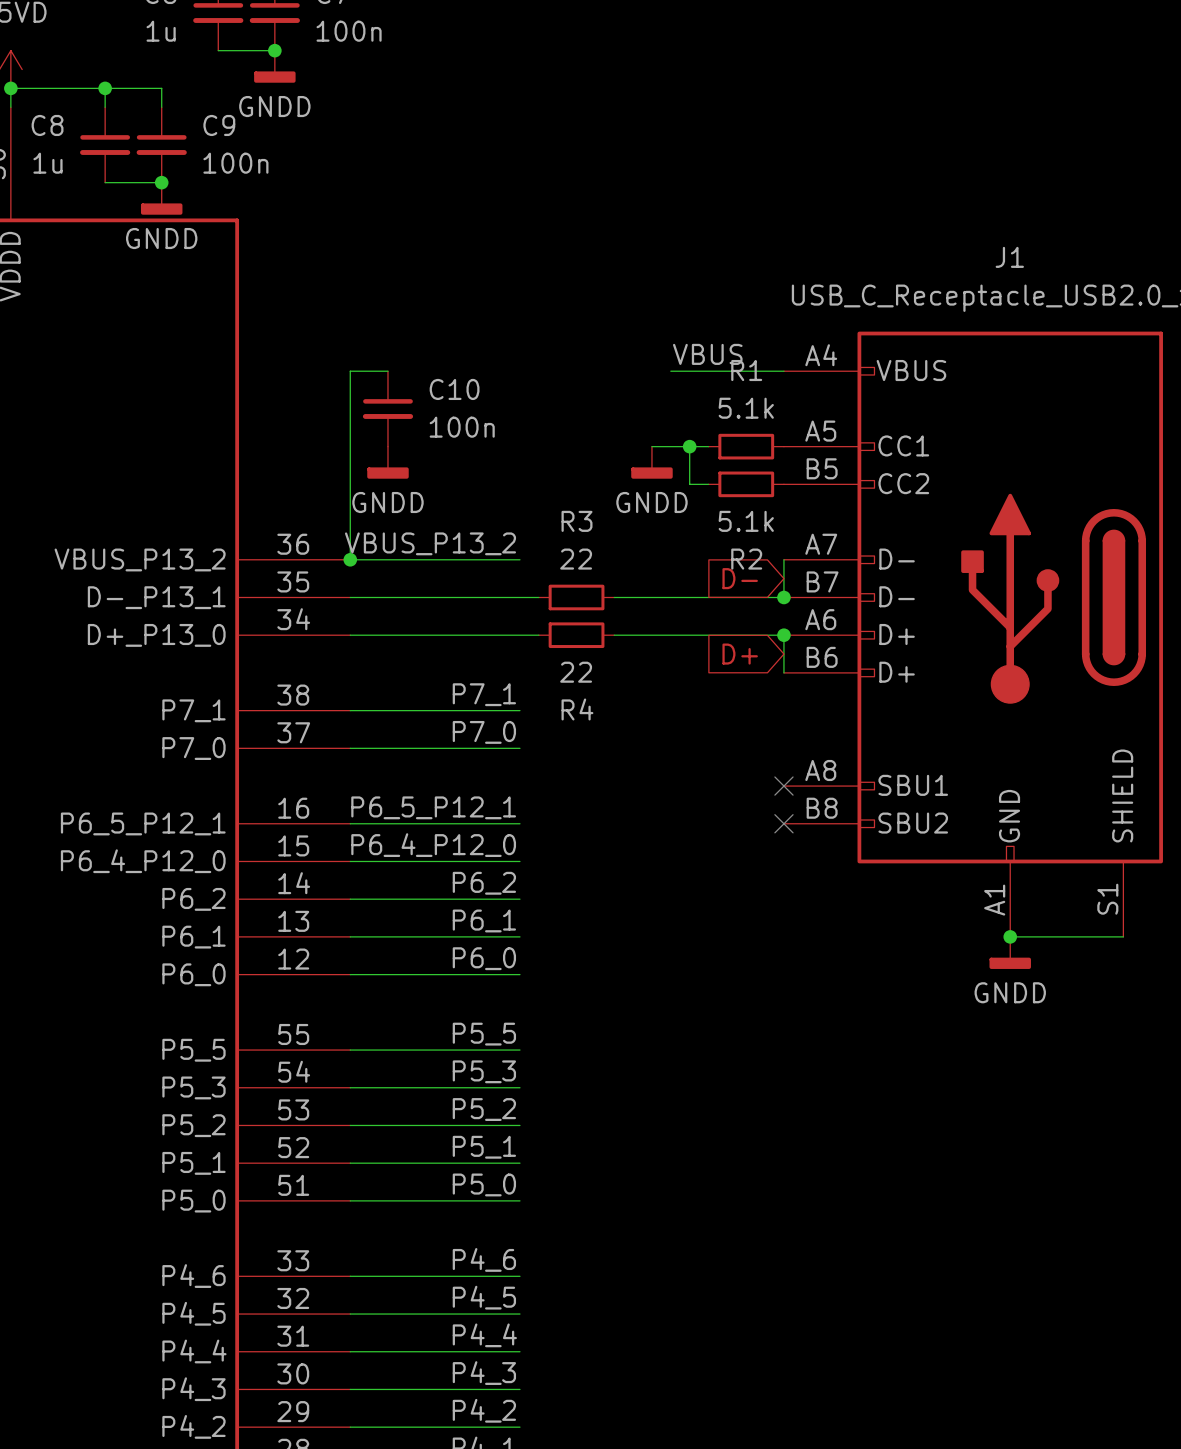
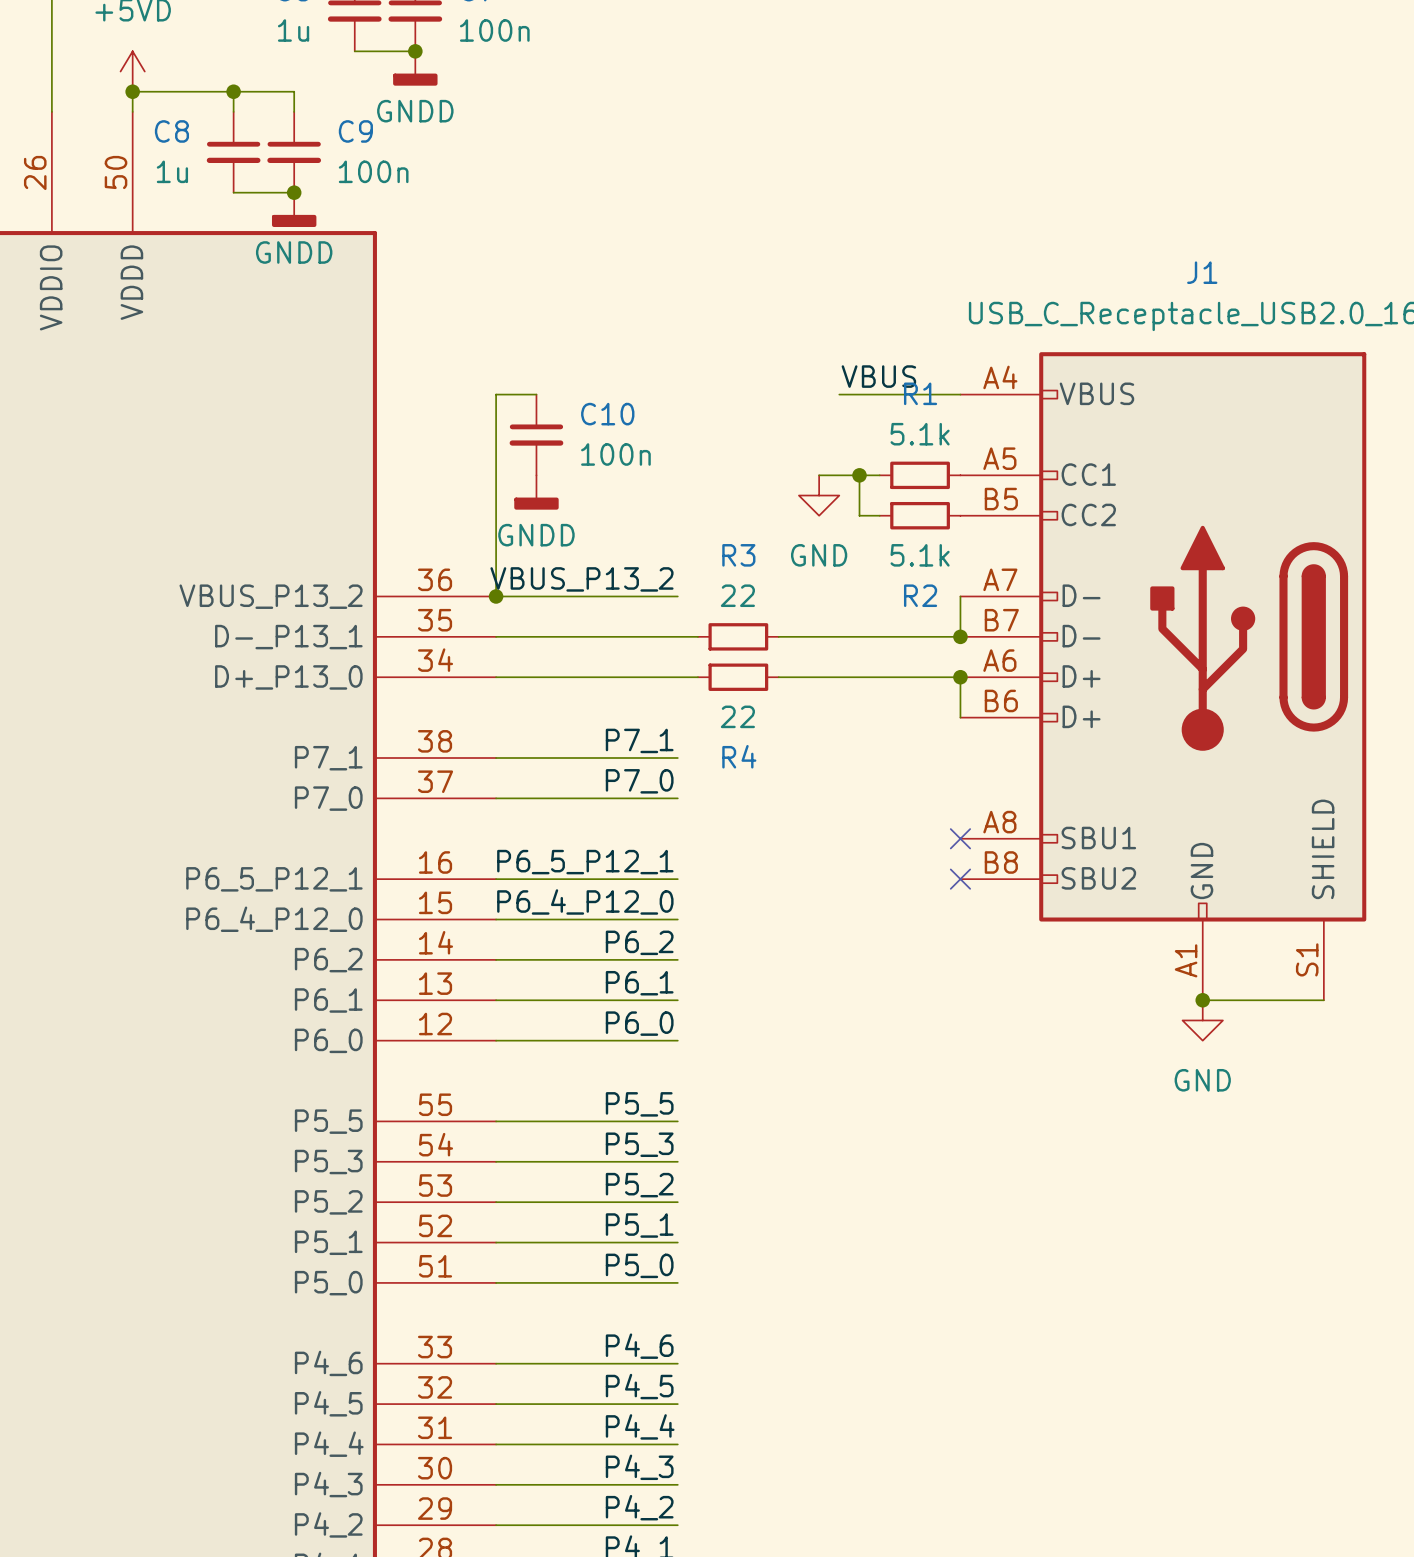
power symbol: GNDD (651, 462) -> GND (819, 495)
global label: D- (740, 578) -> none
global label: D+ (740, 654) -> none
power symbol: GNDD (1010, 952) -> GND (1202, 1020)

